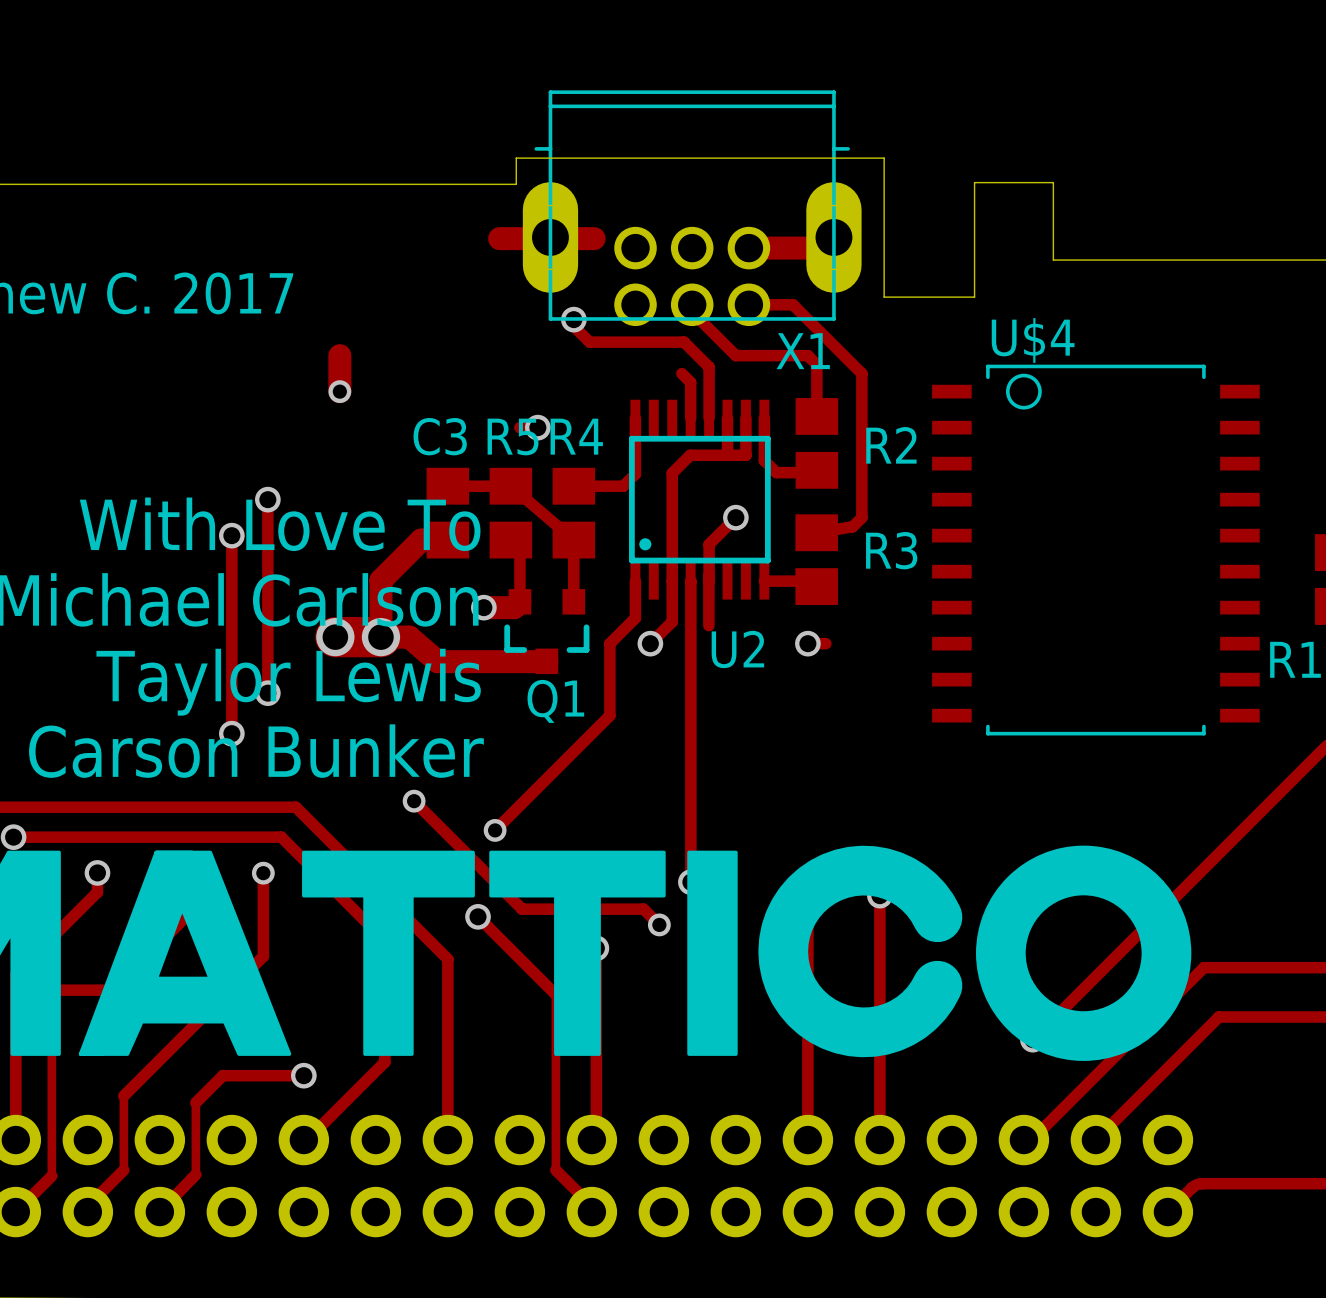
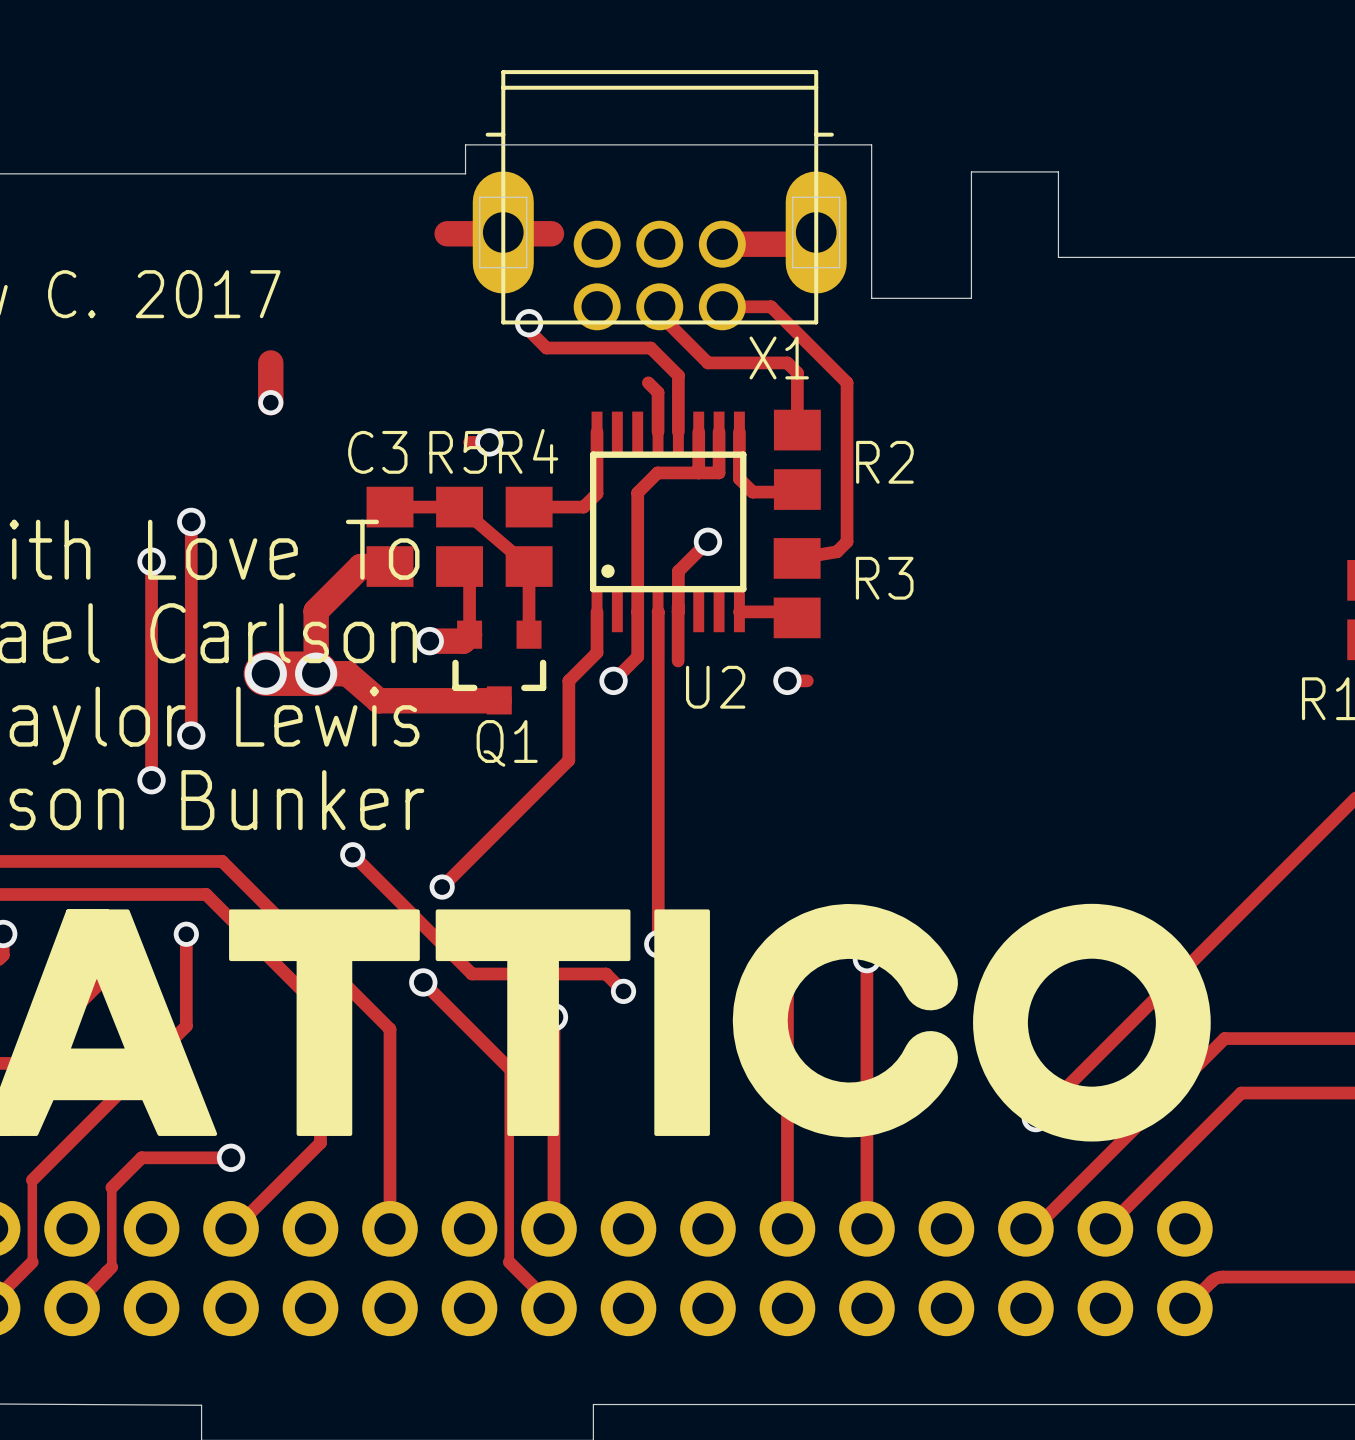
U$4: (1095, 550) -> none

